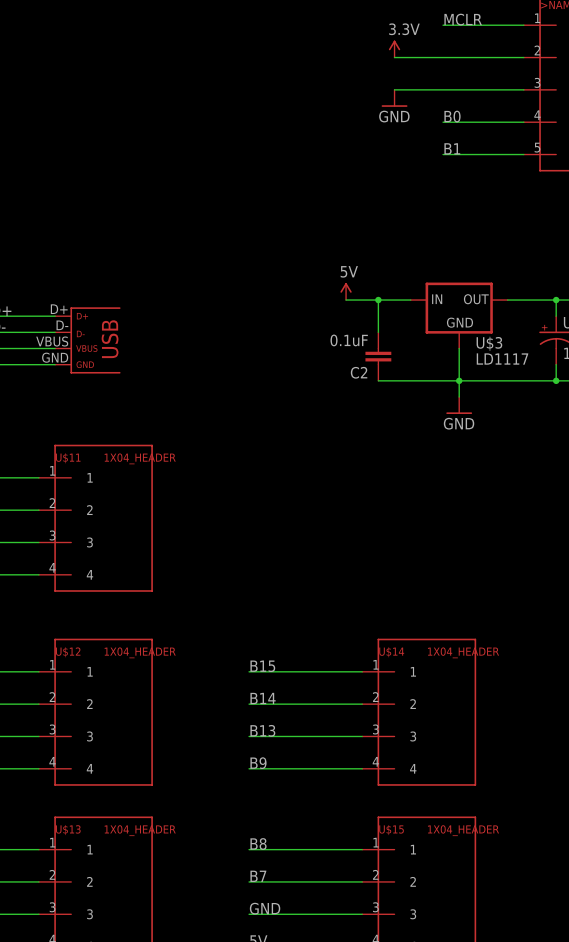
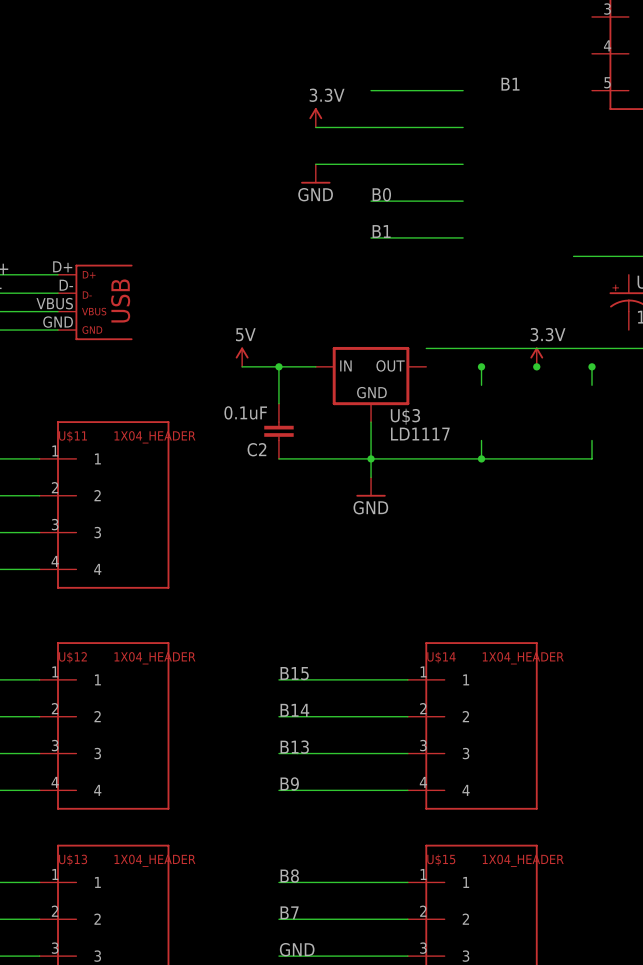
wire: (394, 89) (523, 89) -> (315, 127) (463, 127)
power symbol: GND (394, 98) -> none
label: B0 (452, 116) -> none
wire: (443, 122) (523, 122) -> (371, 90) (463, 90)
wire: (443, 154) (523, 154) -> (371, 201) (463, 201)
power symbol: none -> 3.3V (315, 117)
wire: none -> (315, 164) (463, 164)
power symbol: none -> GND (315, 173)
label: none -> B0 (381, 194)
label: none -> B1 (381, 231)
wire: none -> (371, 237) (463, 237)
power symbol: 5V (346, 291) -> none
wire: (346, 300) (410, 300) -> none
wire: (378, 300) (378, 332) -> none
junction: (378, 300) -> none
wire: (556, 300) (556, 316) -> none
junction: (556, 300) -> none
U$3 position: (459, 315) -> (371, 384)
wire: (459, 348) (459, 397) -> none
C2 position: (378, 356) -> (278, 431)
wire: (556, 364) (556, 380) -> (592, 366) (592, 385)
junction: (459, 380) -> none
junction: (556, 380) -> none
power symbol: none -> 5V (242, 357)
power symbol: none -> 3.3V (536, 357)
wire: none -> (242, 366) (315, 366)
wire: none -> (278, 366) (278, 403)
junction: none -> (278, 366)
wire: none -> (481, 366) (481, 385)
junction: none -> (481, 366)
junction: none -> (536, 366)
junction: none -> (592, 366)
power symbol: GND (459, 405) -> none
wire: none -> (371, 422) (371, 477)
wire: none -> (481, 440) (481, 458)
wire: none -> (592, 440) (592, 458) (278, 458)
junction: none -> (371, 458)
junction: none -> (481, 458)
power symbol: none -> GND (371, 487)

